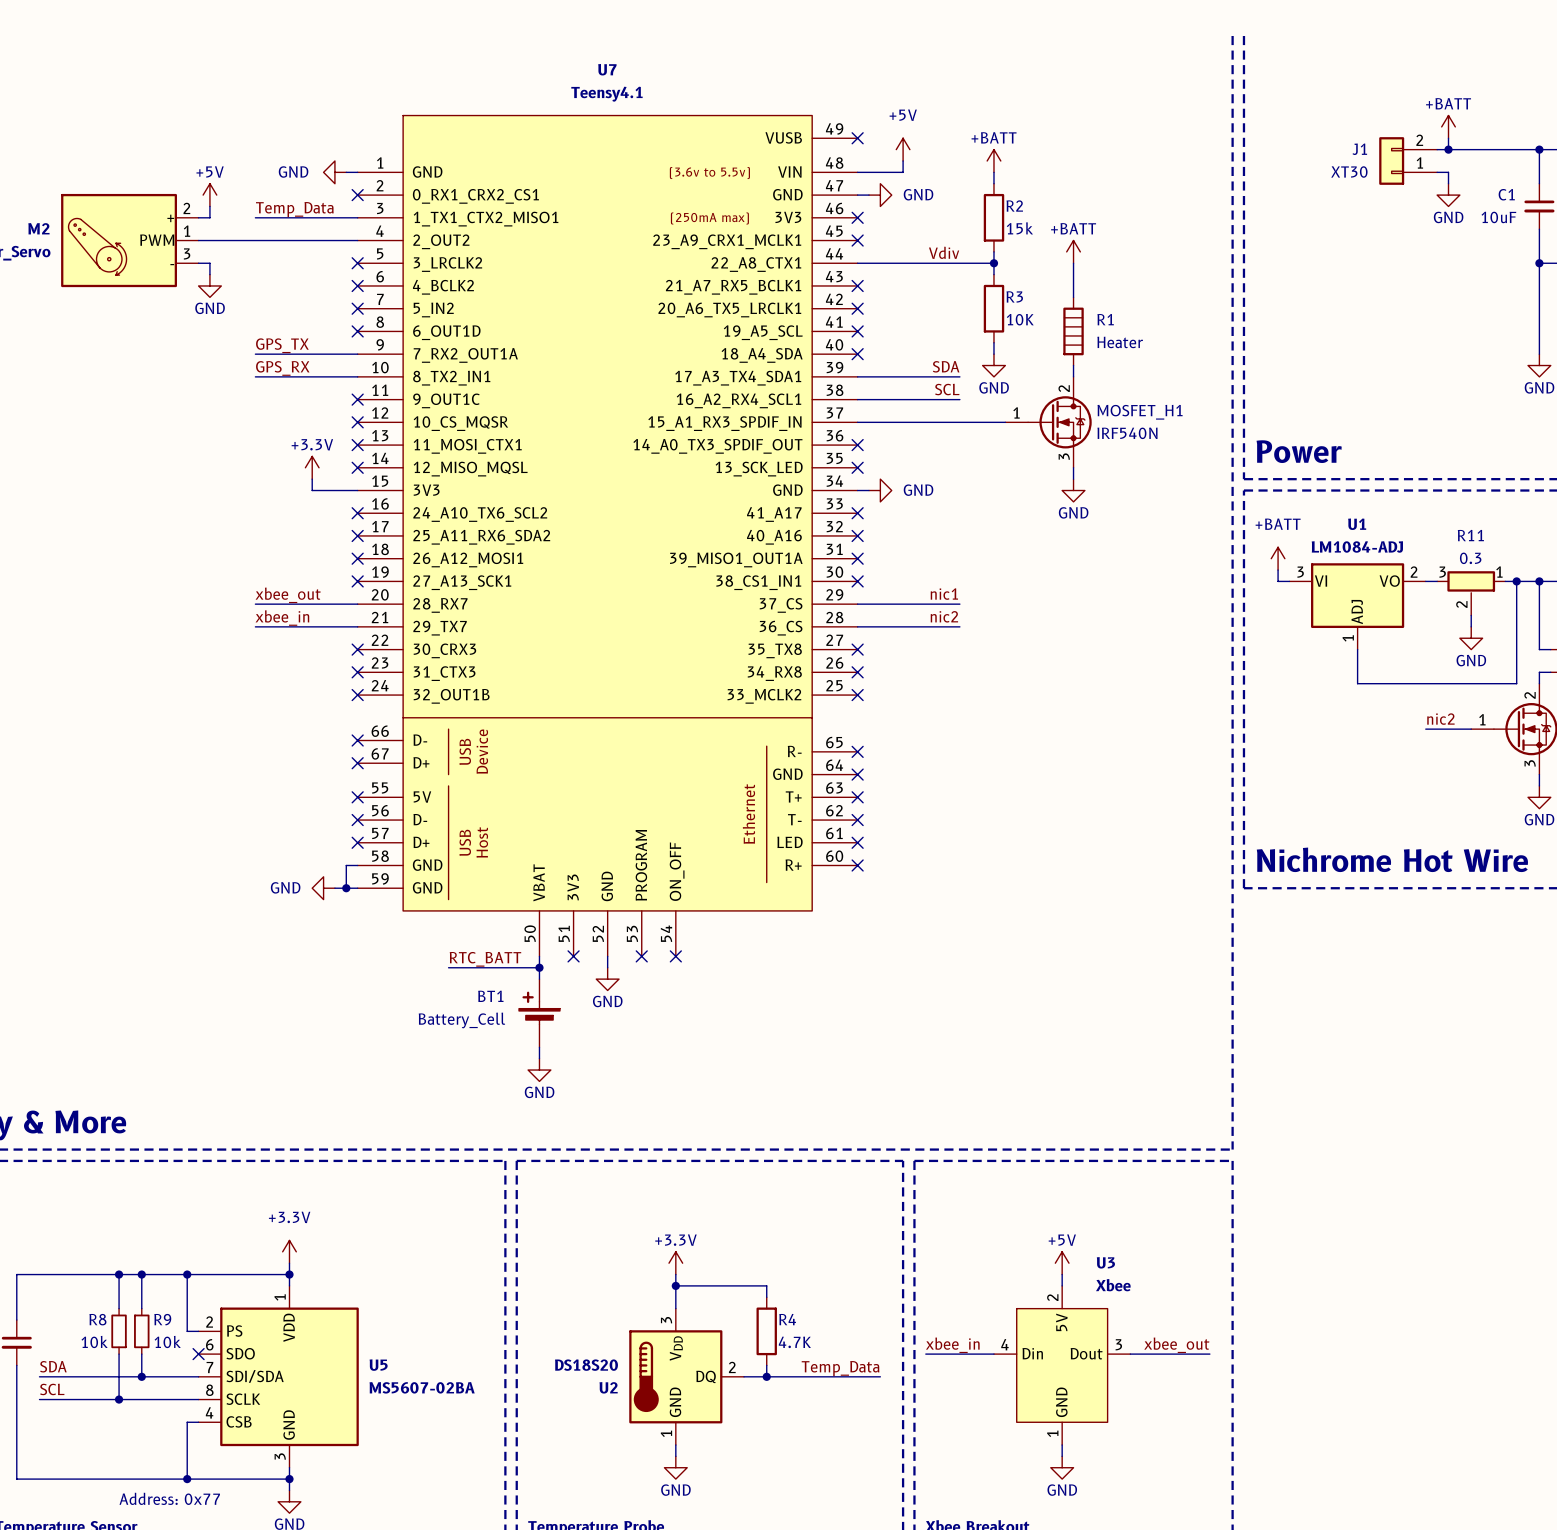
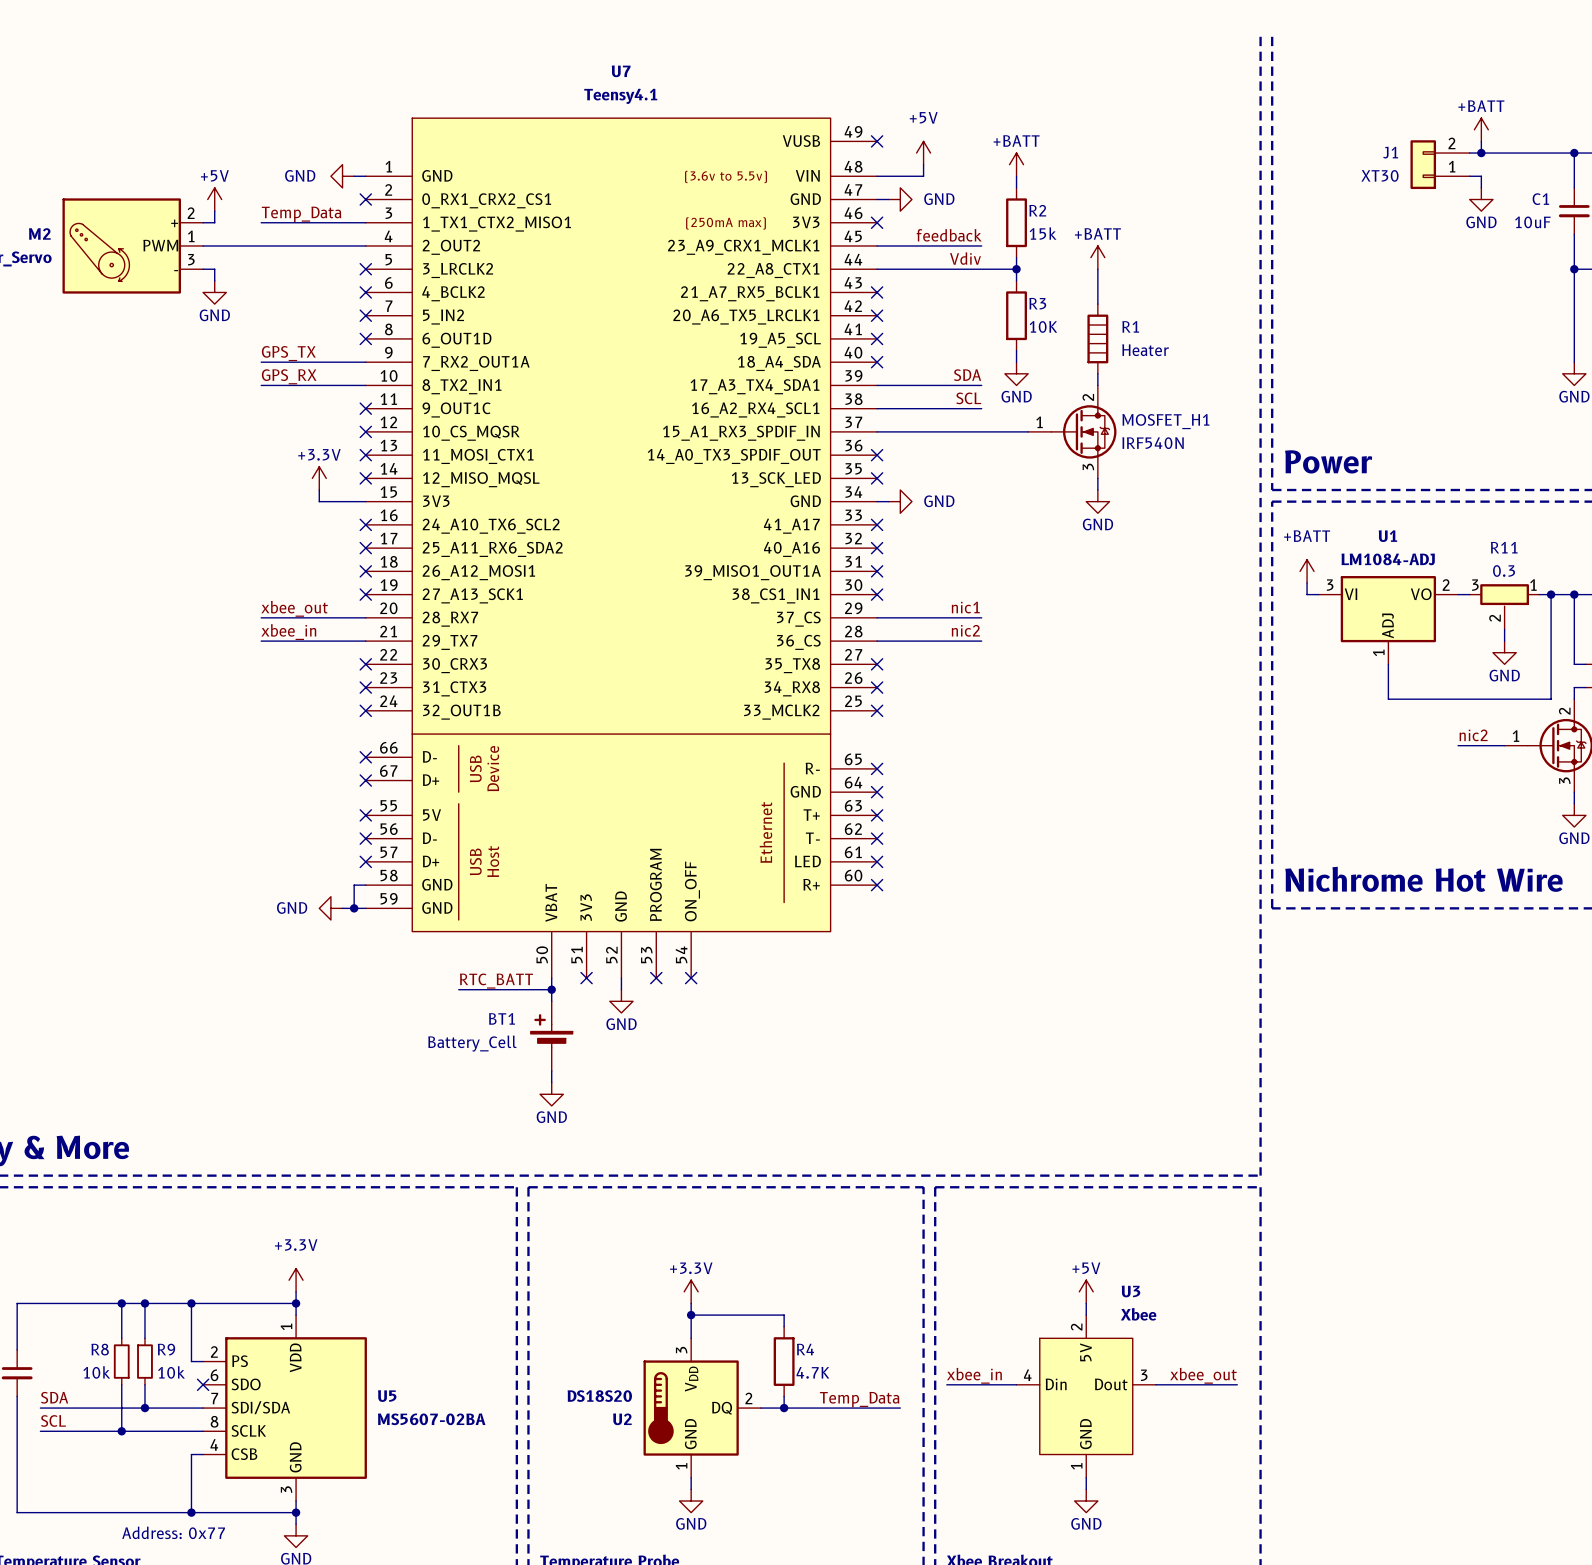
label: none -> feedback (949, 235)
wire: none -> (877, 245) (981, 245)
no-connect mark: (857, 240) -> none

